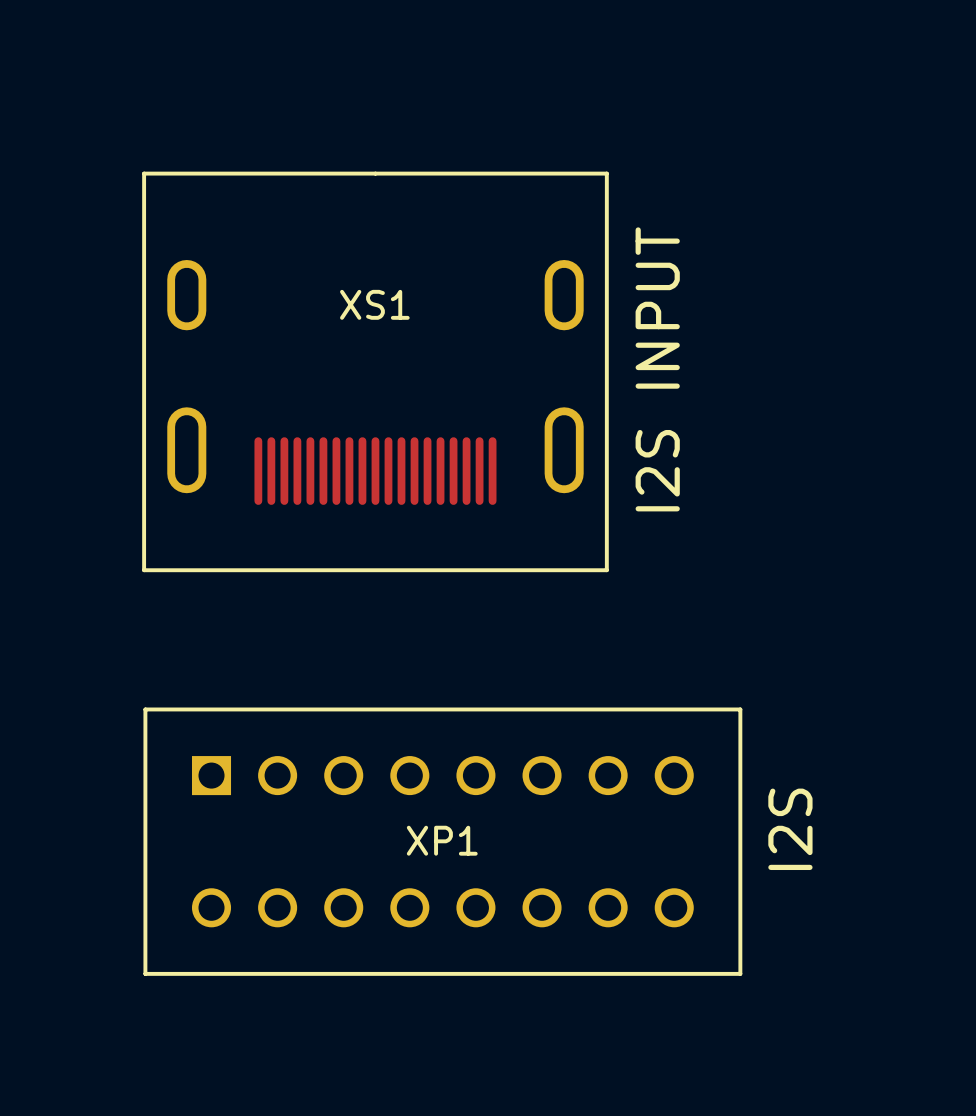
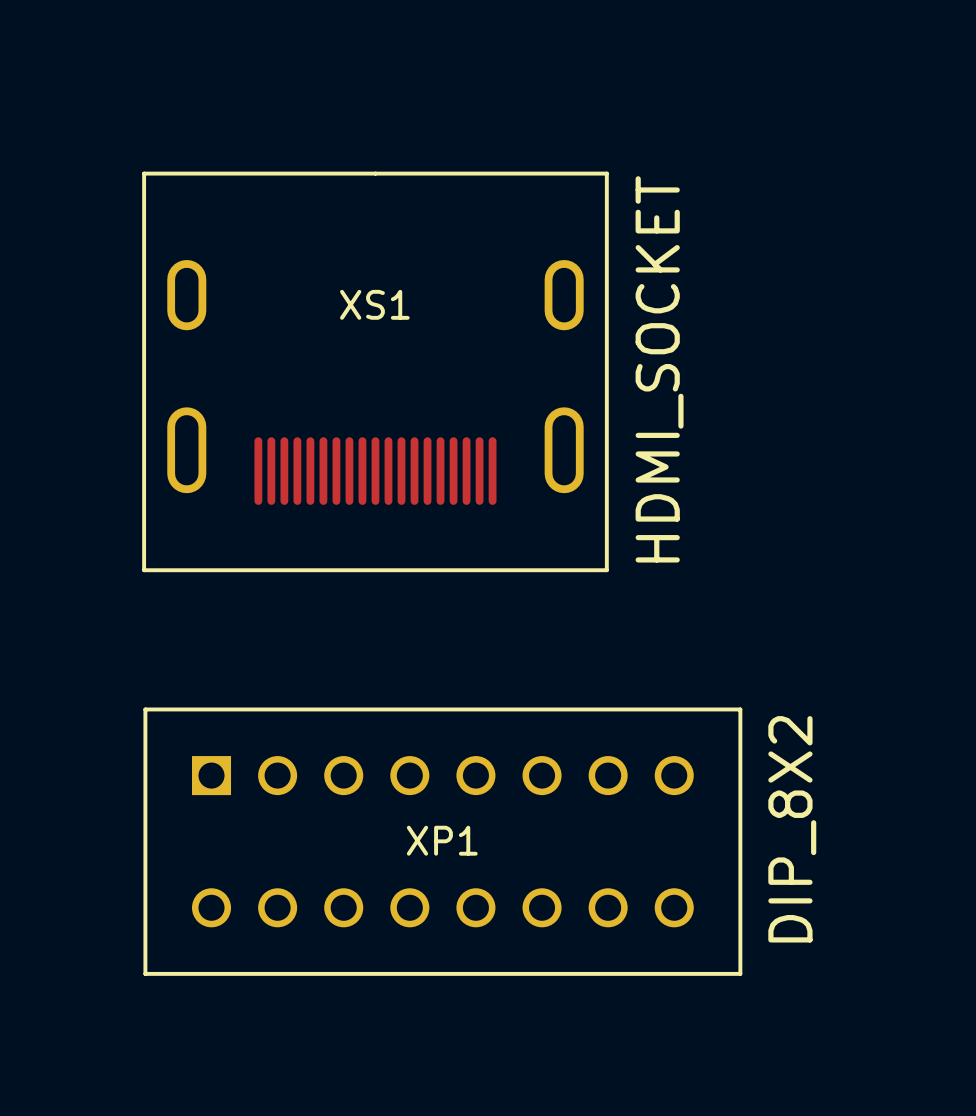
XS1 value: I2S INPUT (657, 369) -> HDMI_SOCKET (659, 369)
XP1 value: I2S (790, 829) -> DIP_8X2 (792, 829)

